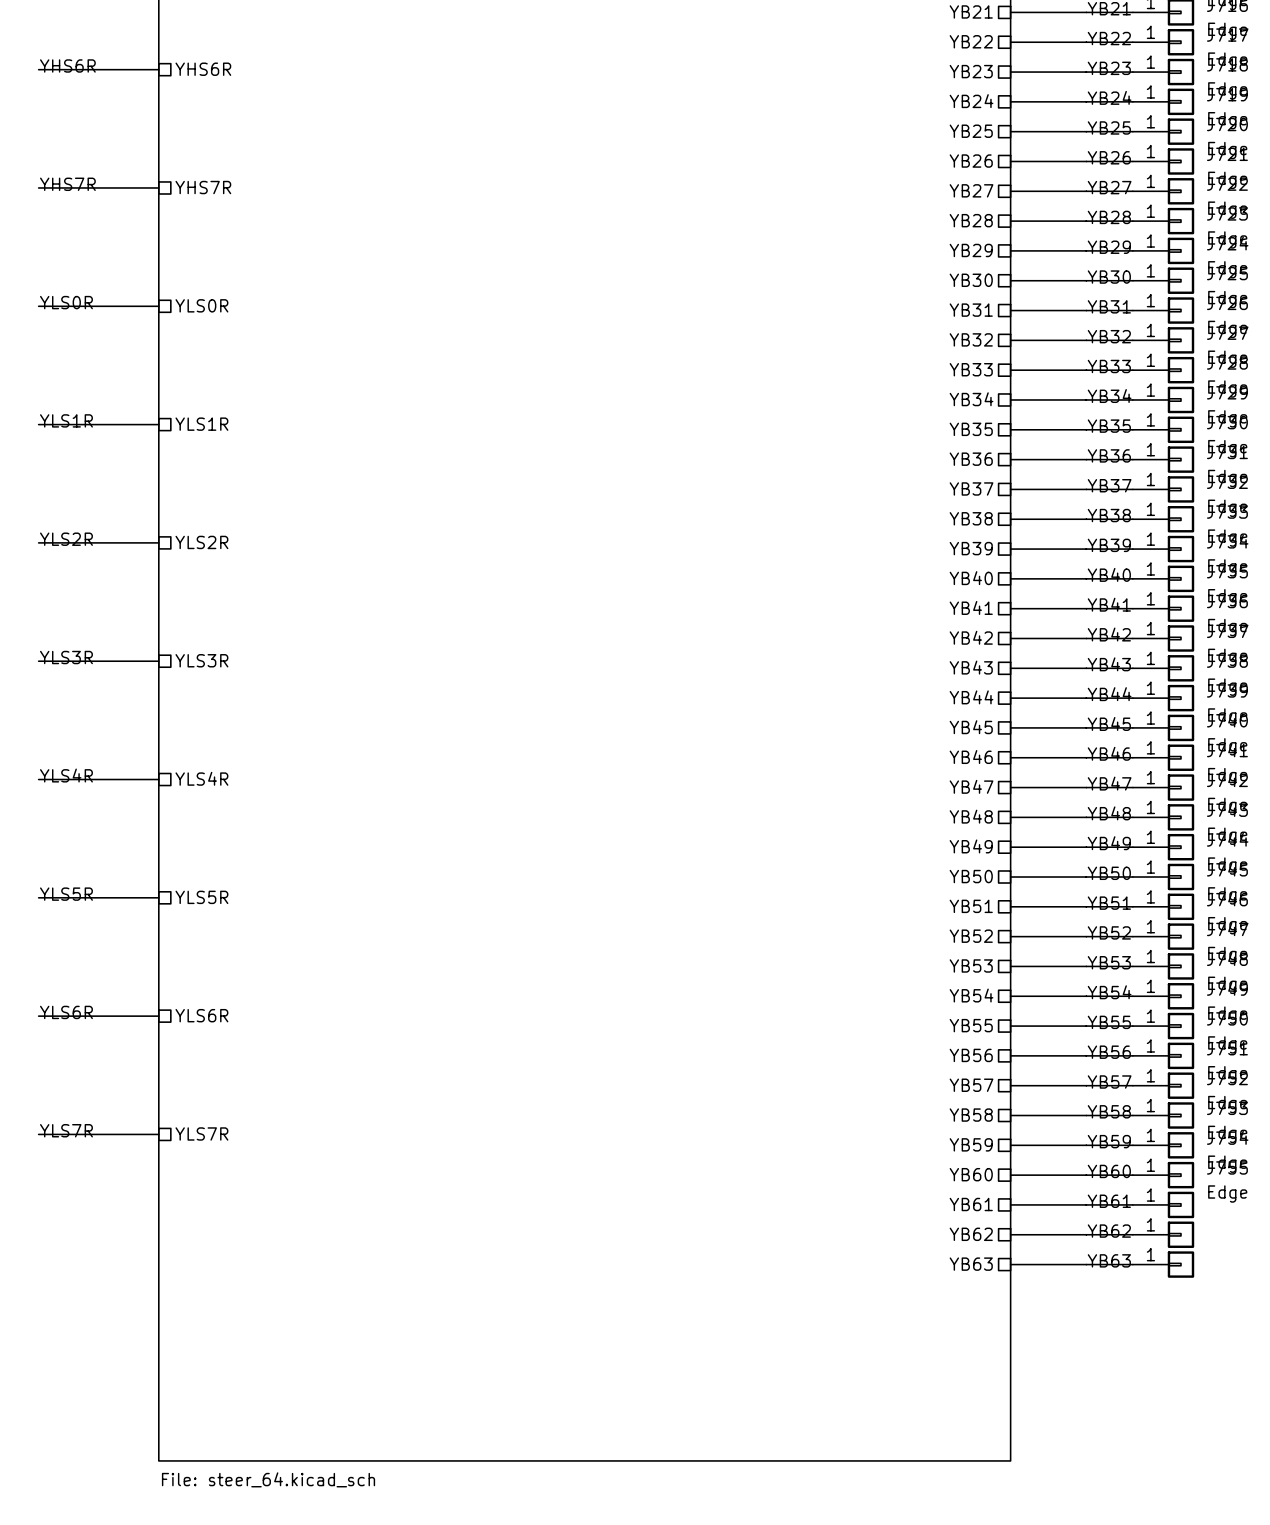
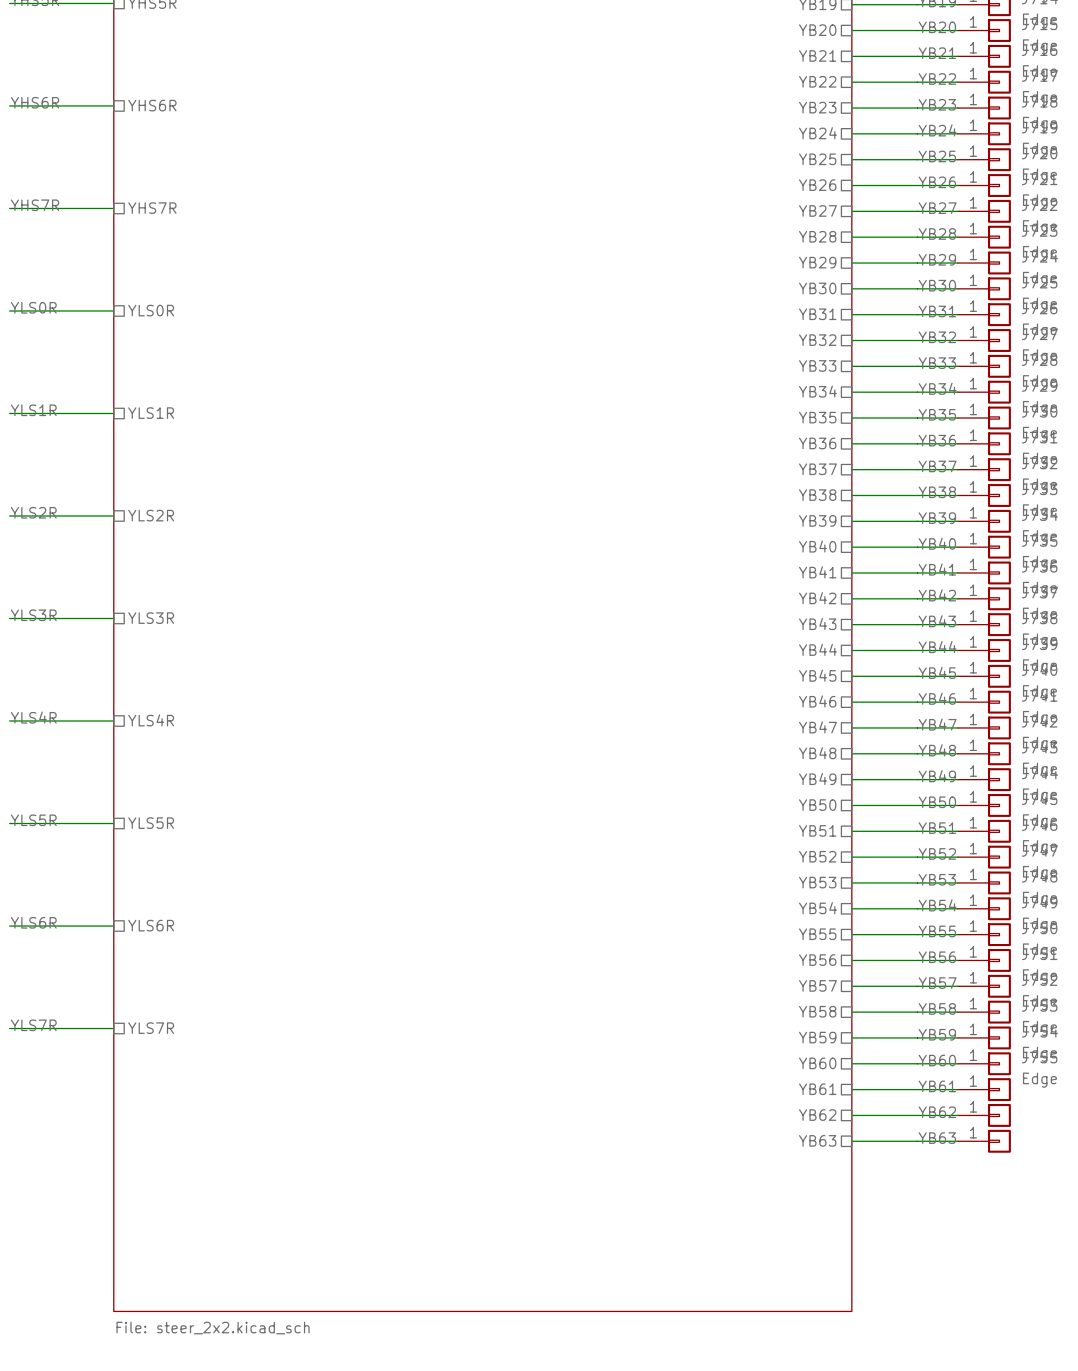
sheet value: File: steer_64.kicad_sch (268, 1479) -> File: steer_2x2.kicad_sch (213, 1328)

